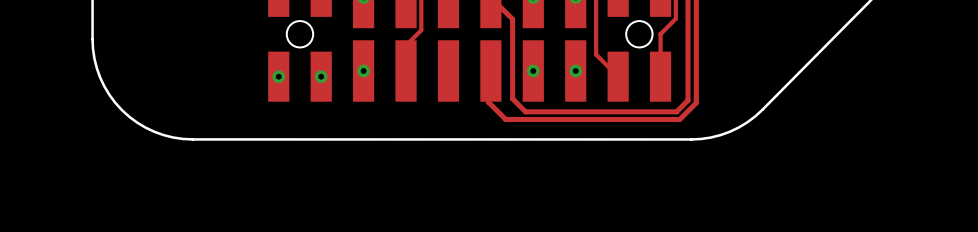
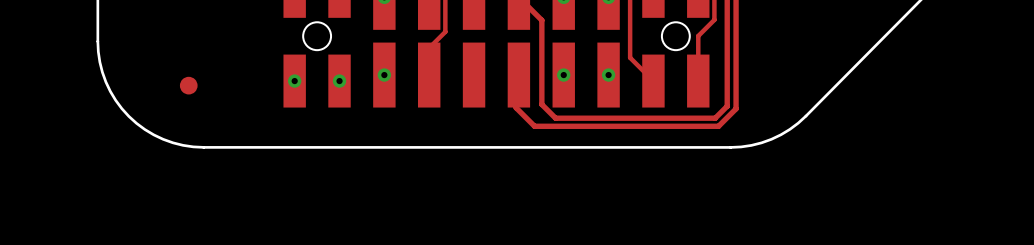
part: none -> (188, 85)

